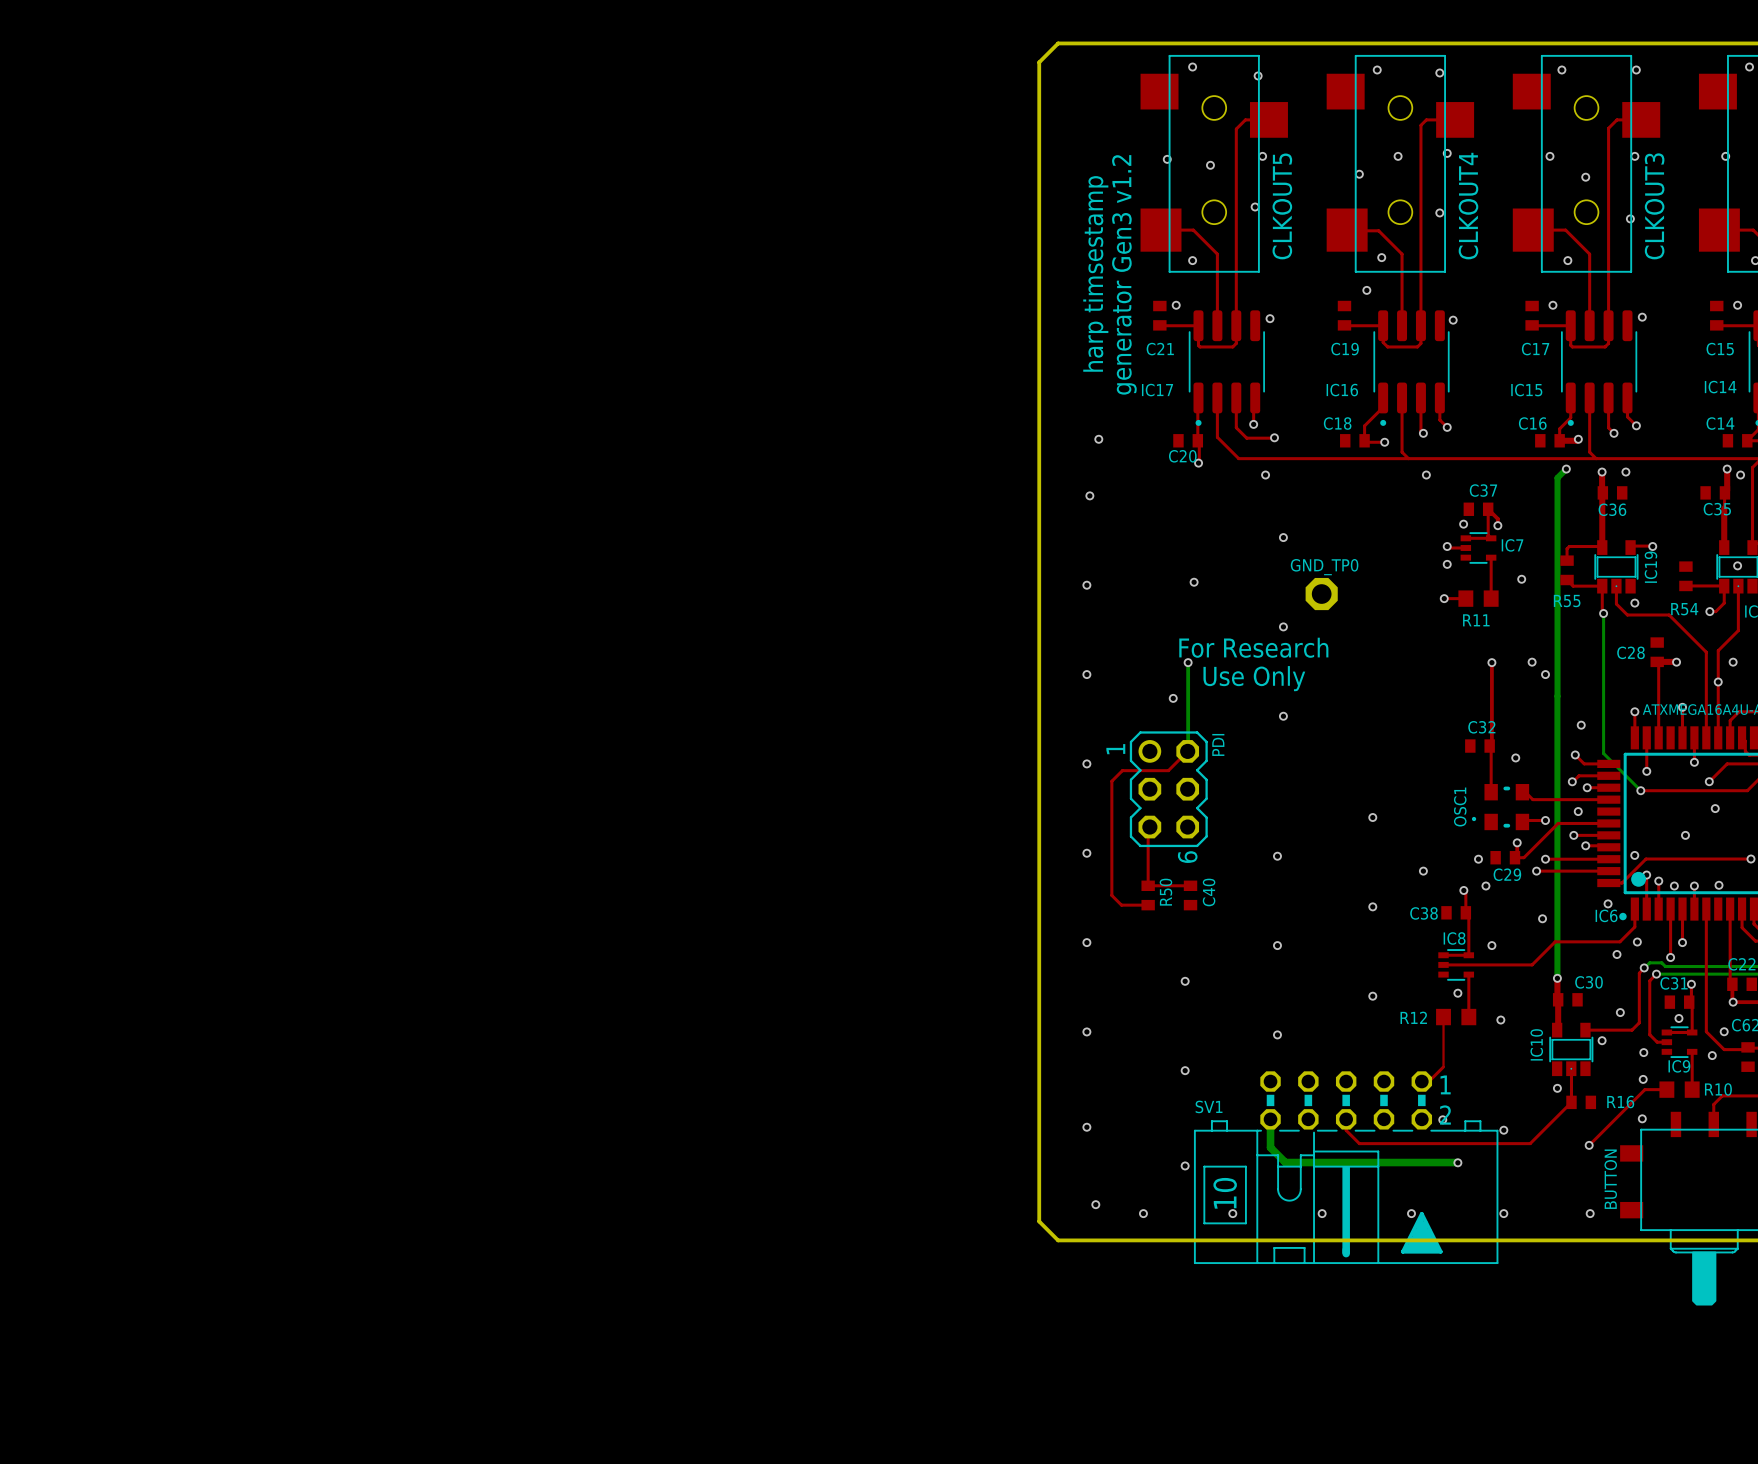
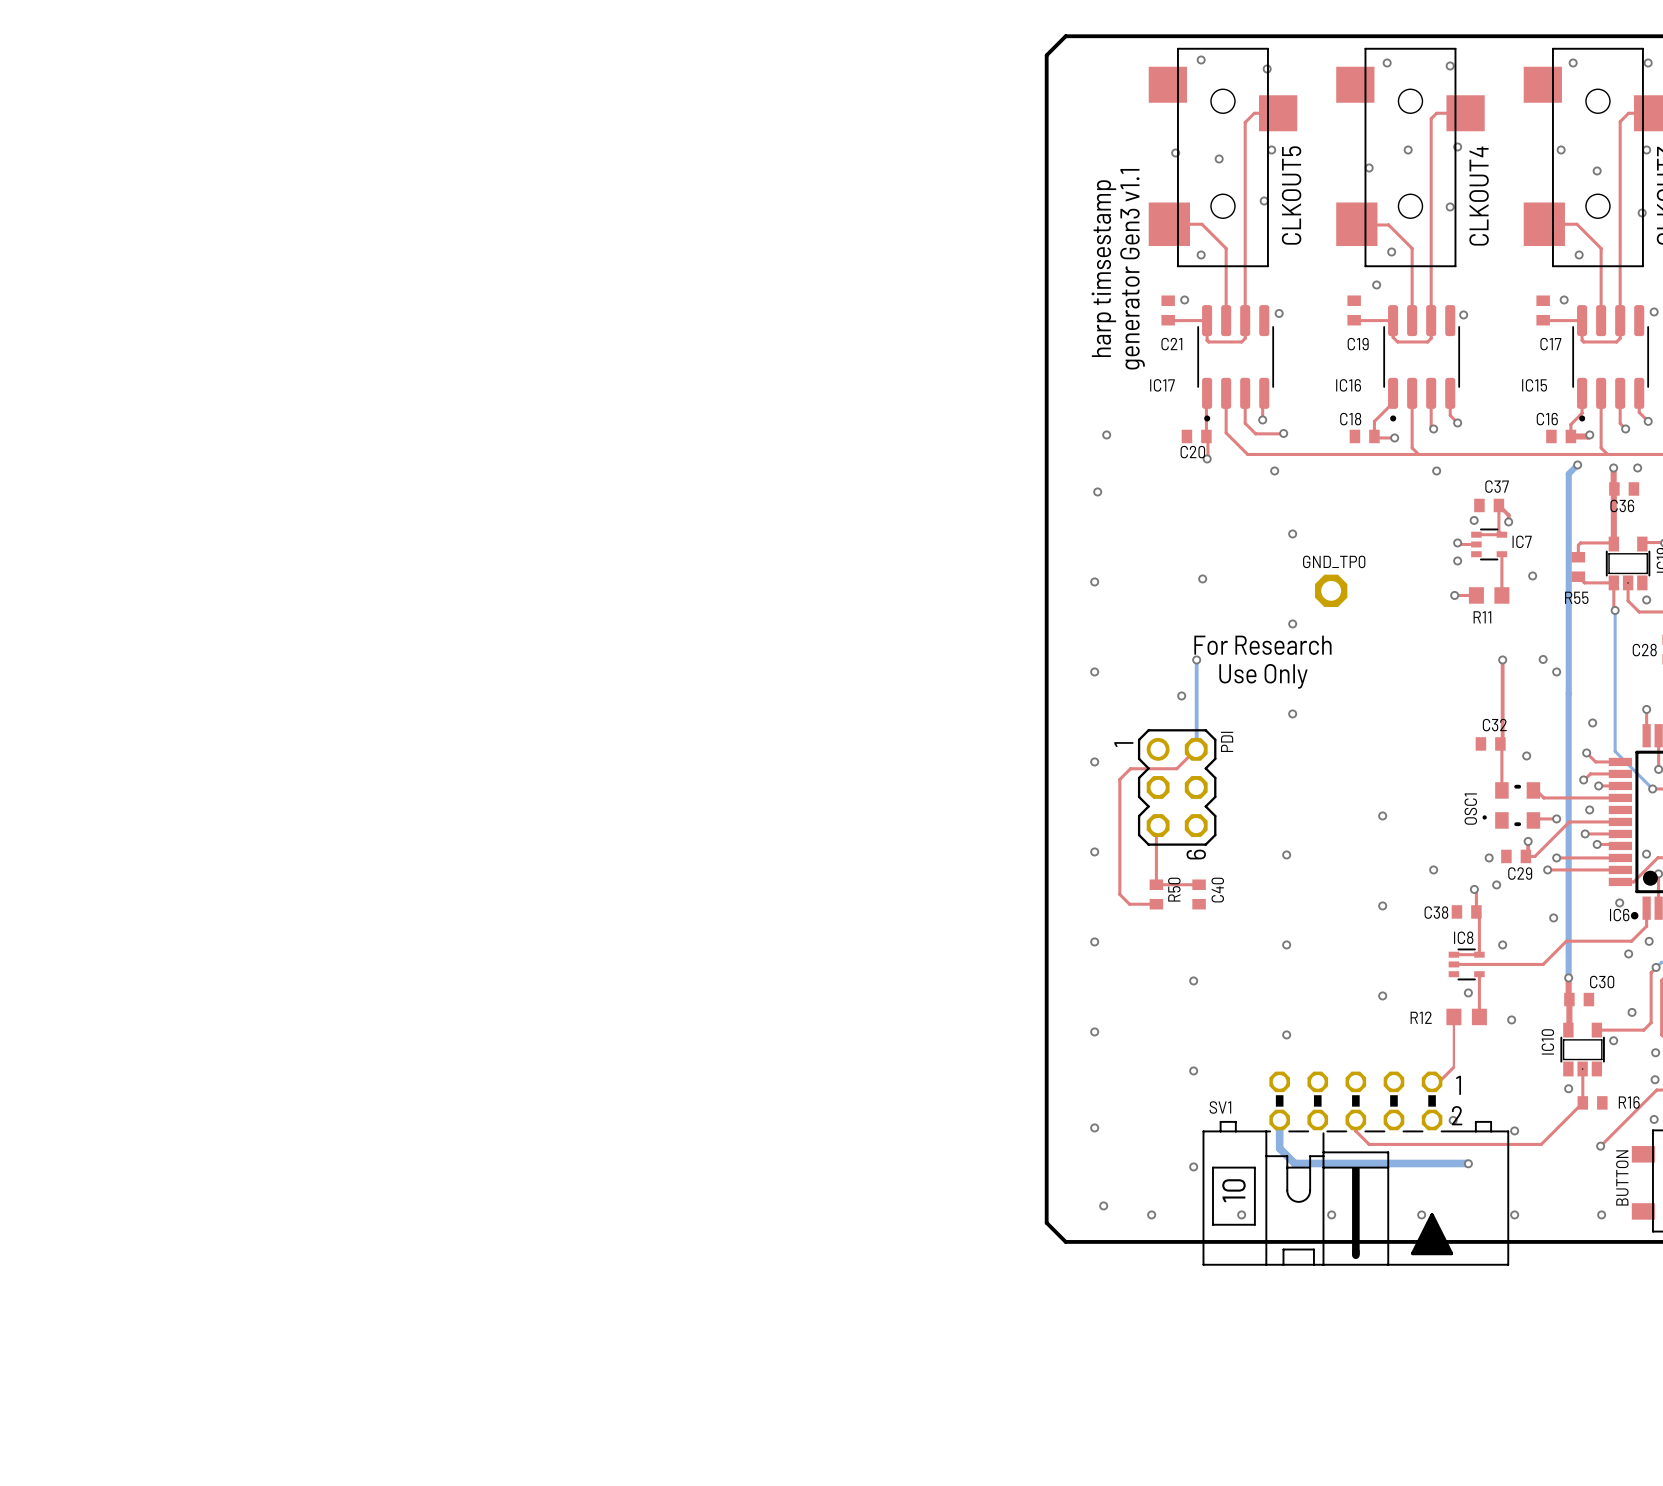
text: generator Gen3 v1.2 (1124, 274) -> generator Gen3 v1.1 (1132, 269)

